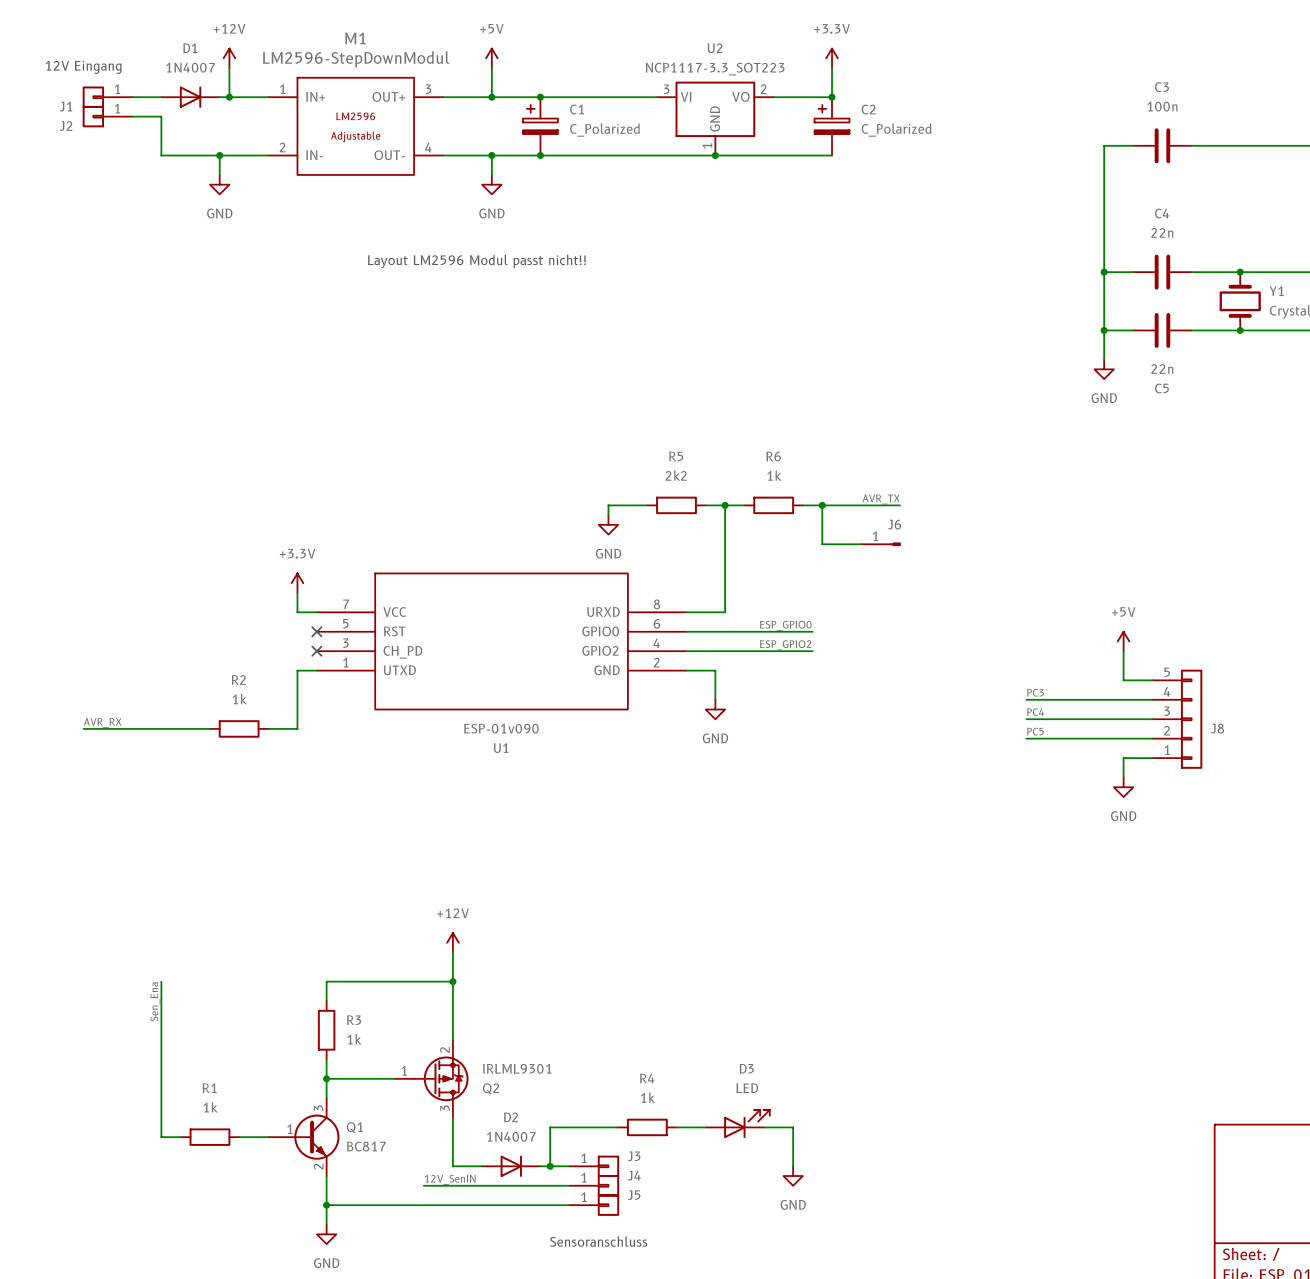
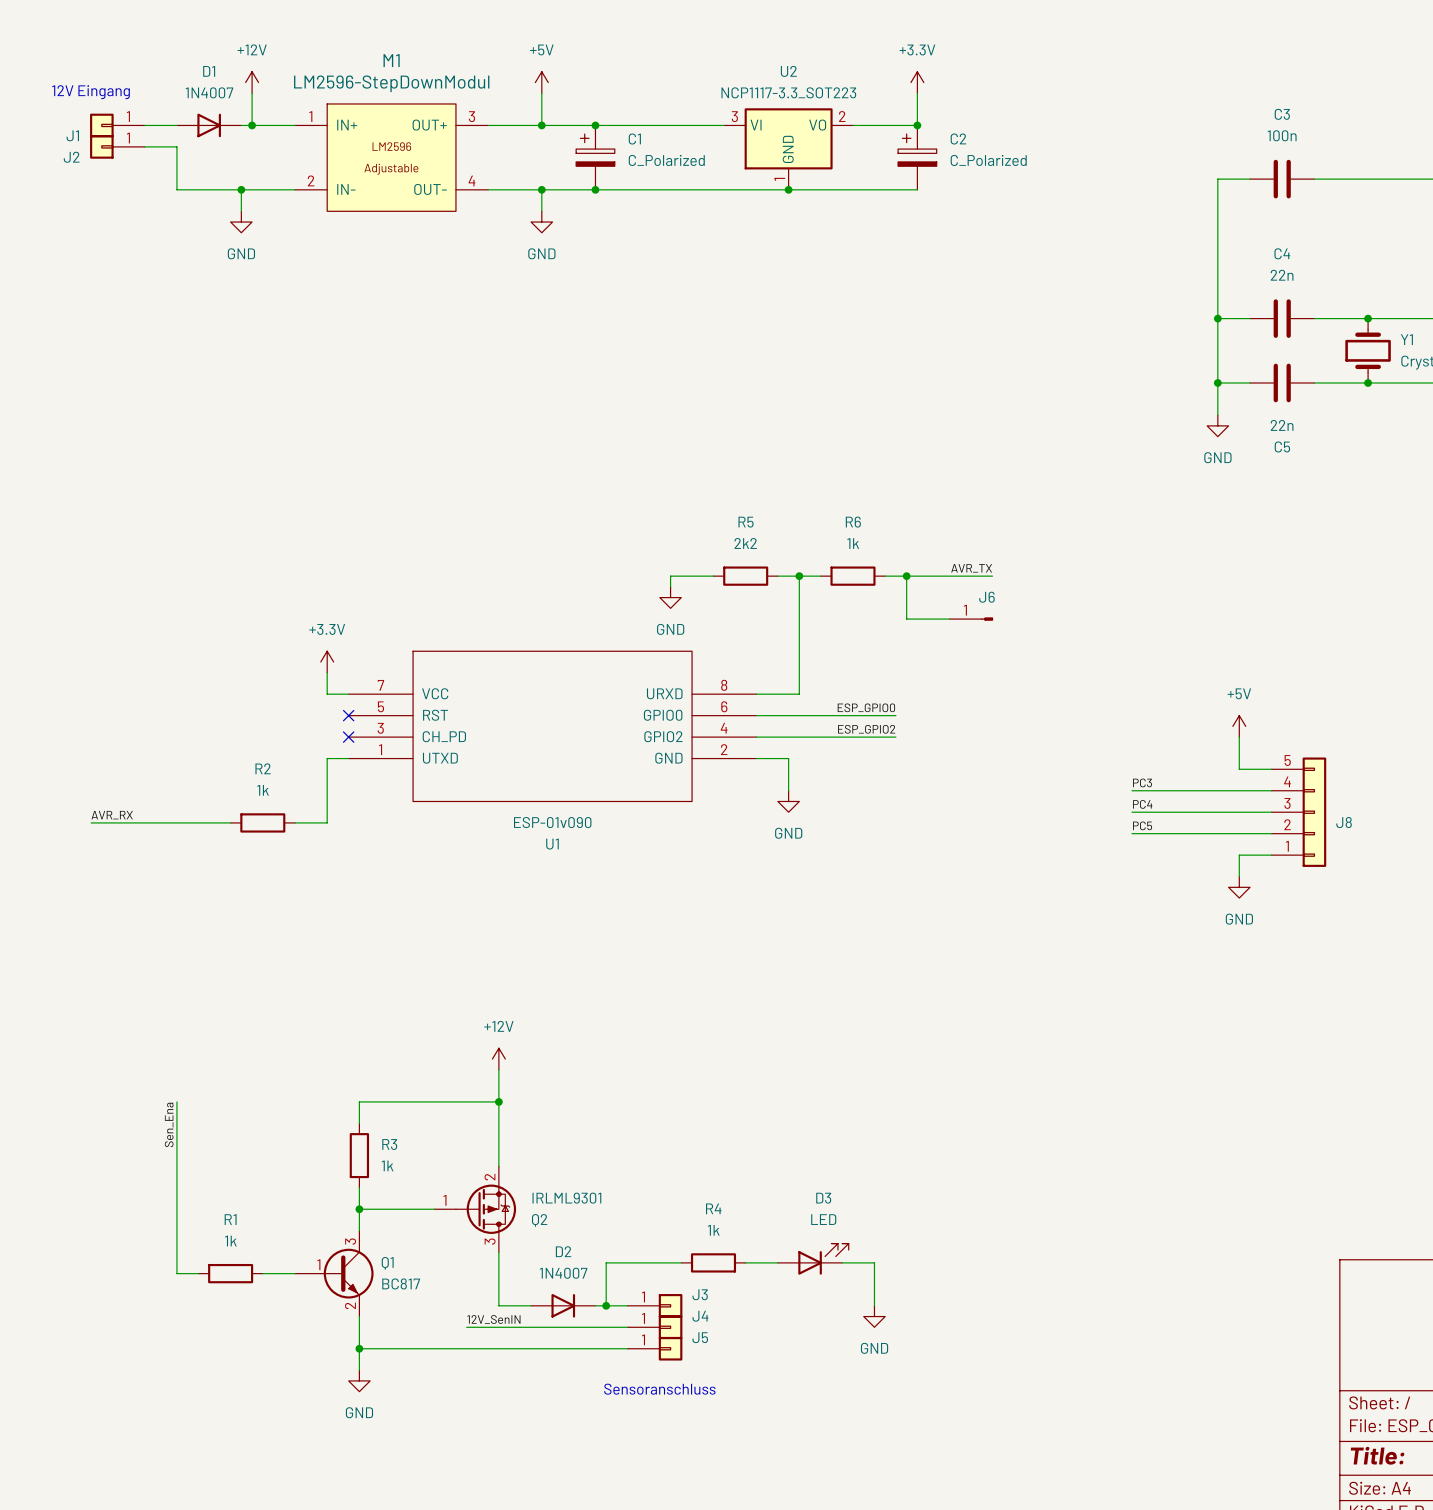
text: Layout LM2596 Modul passt nicht!! (476, 261) -> none

